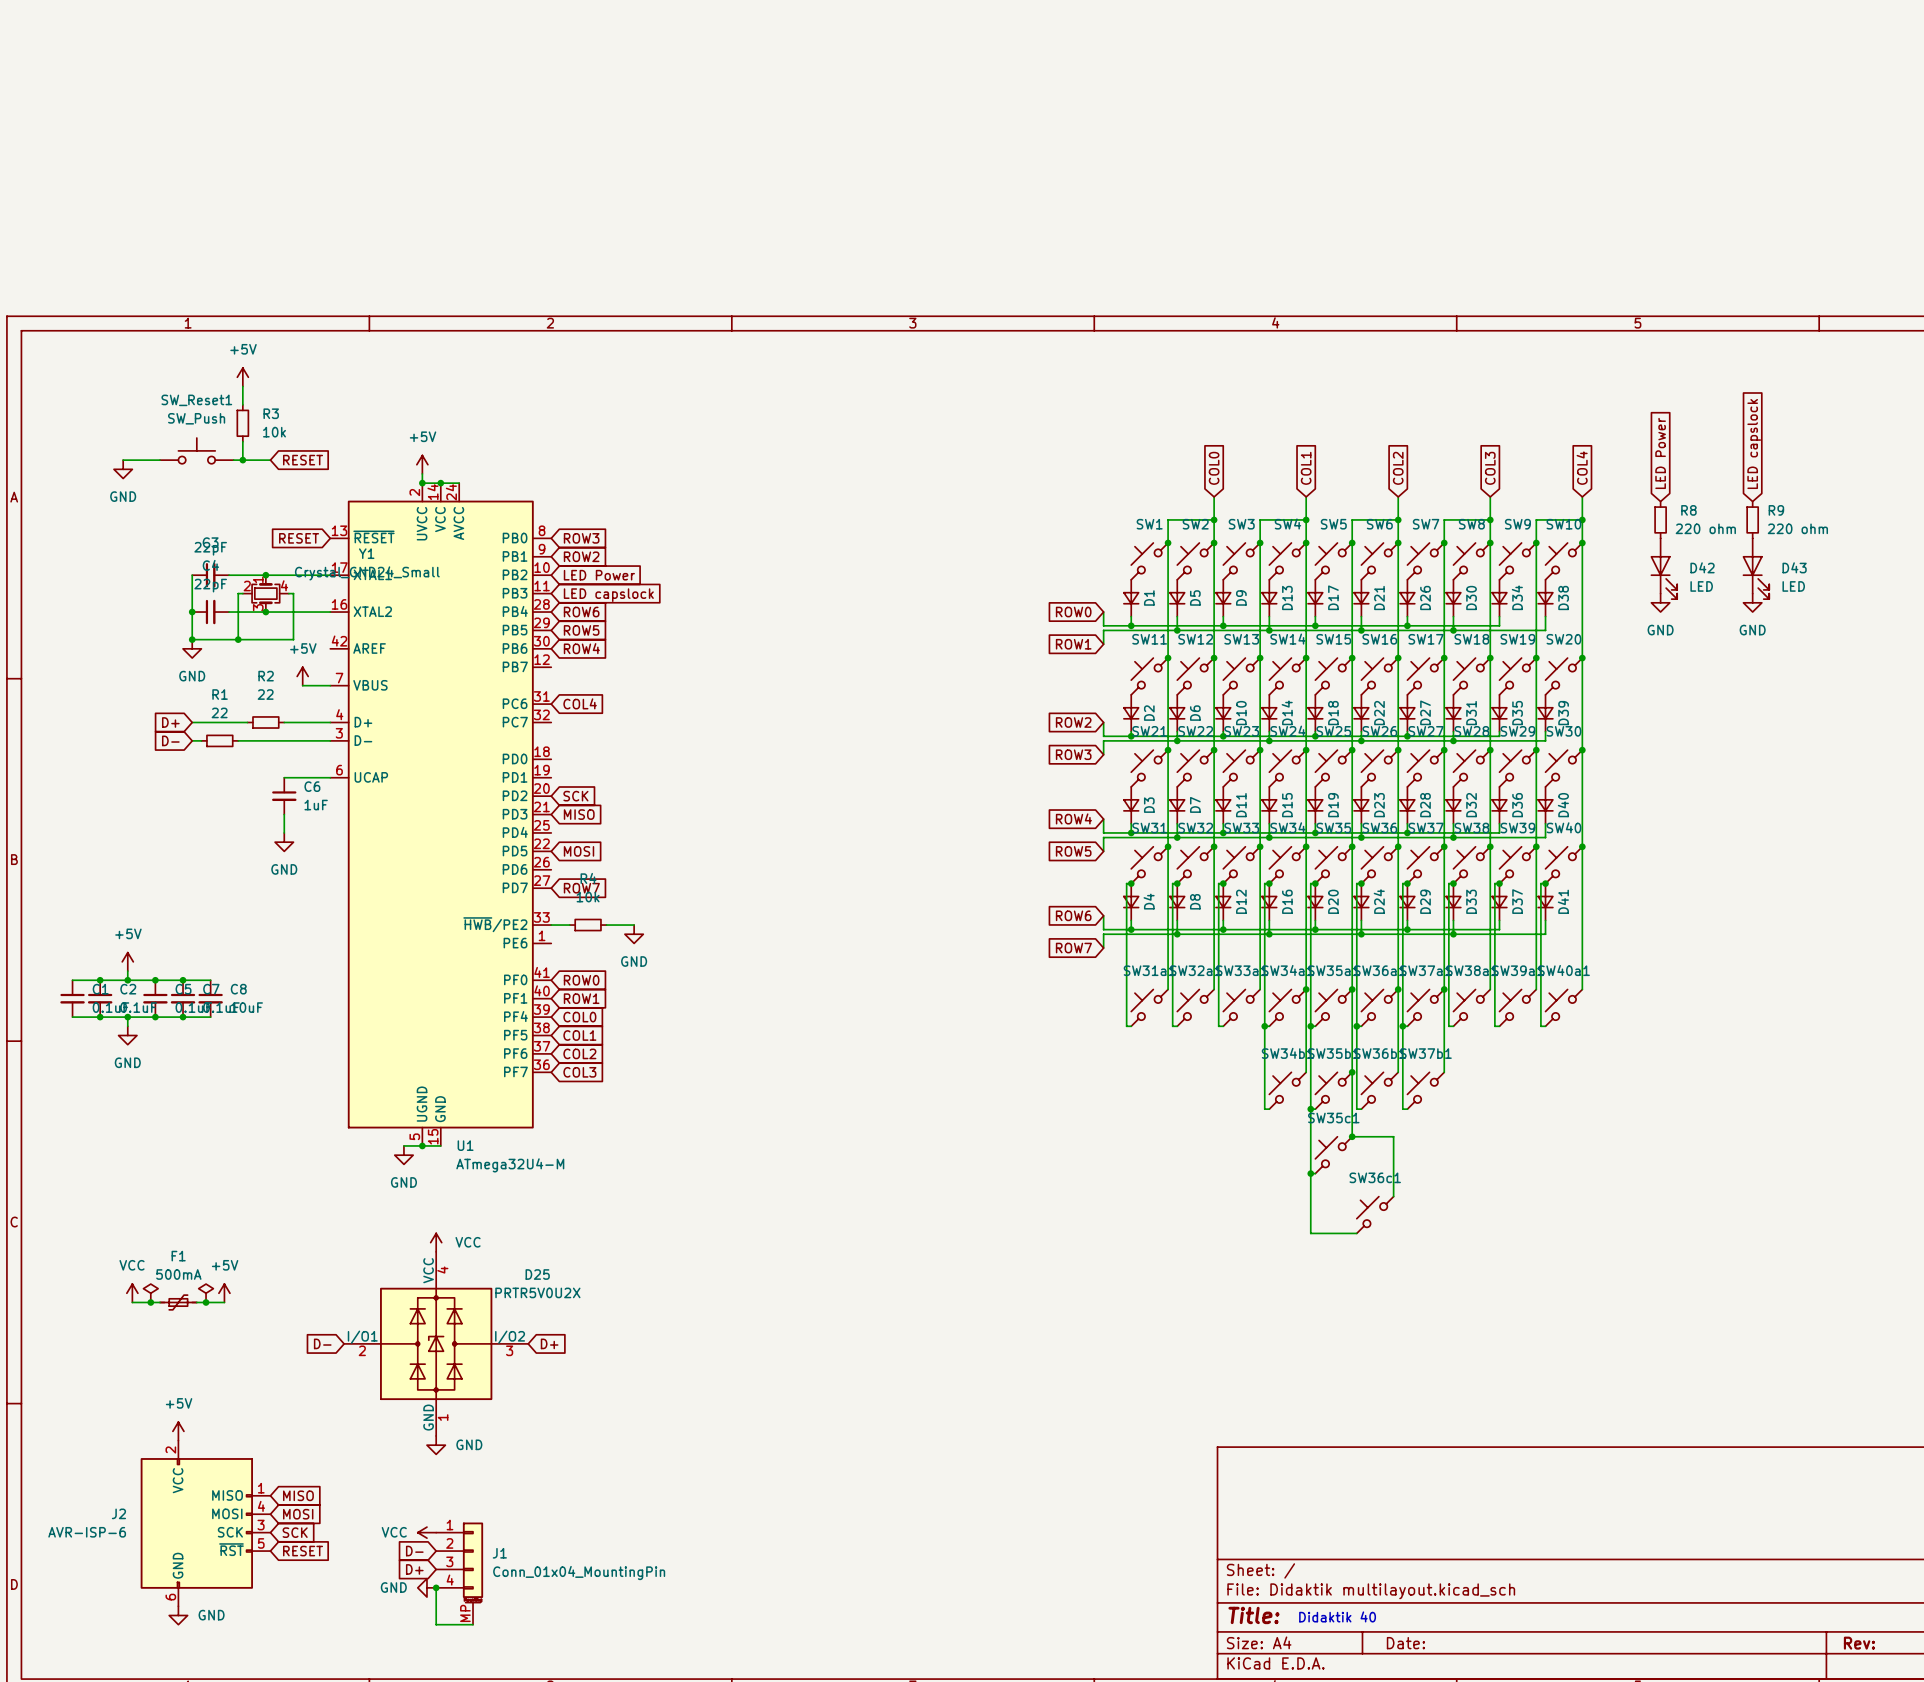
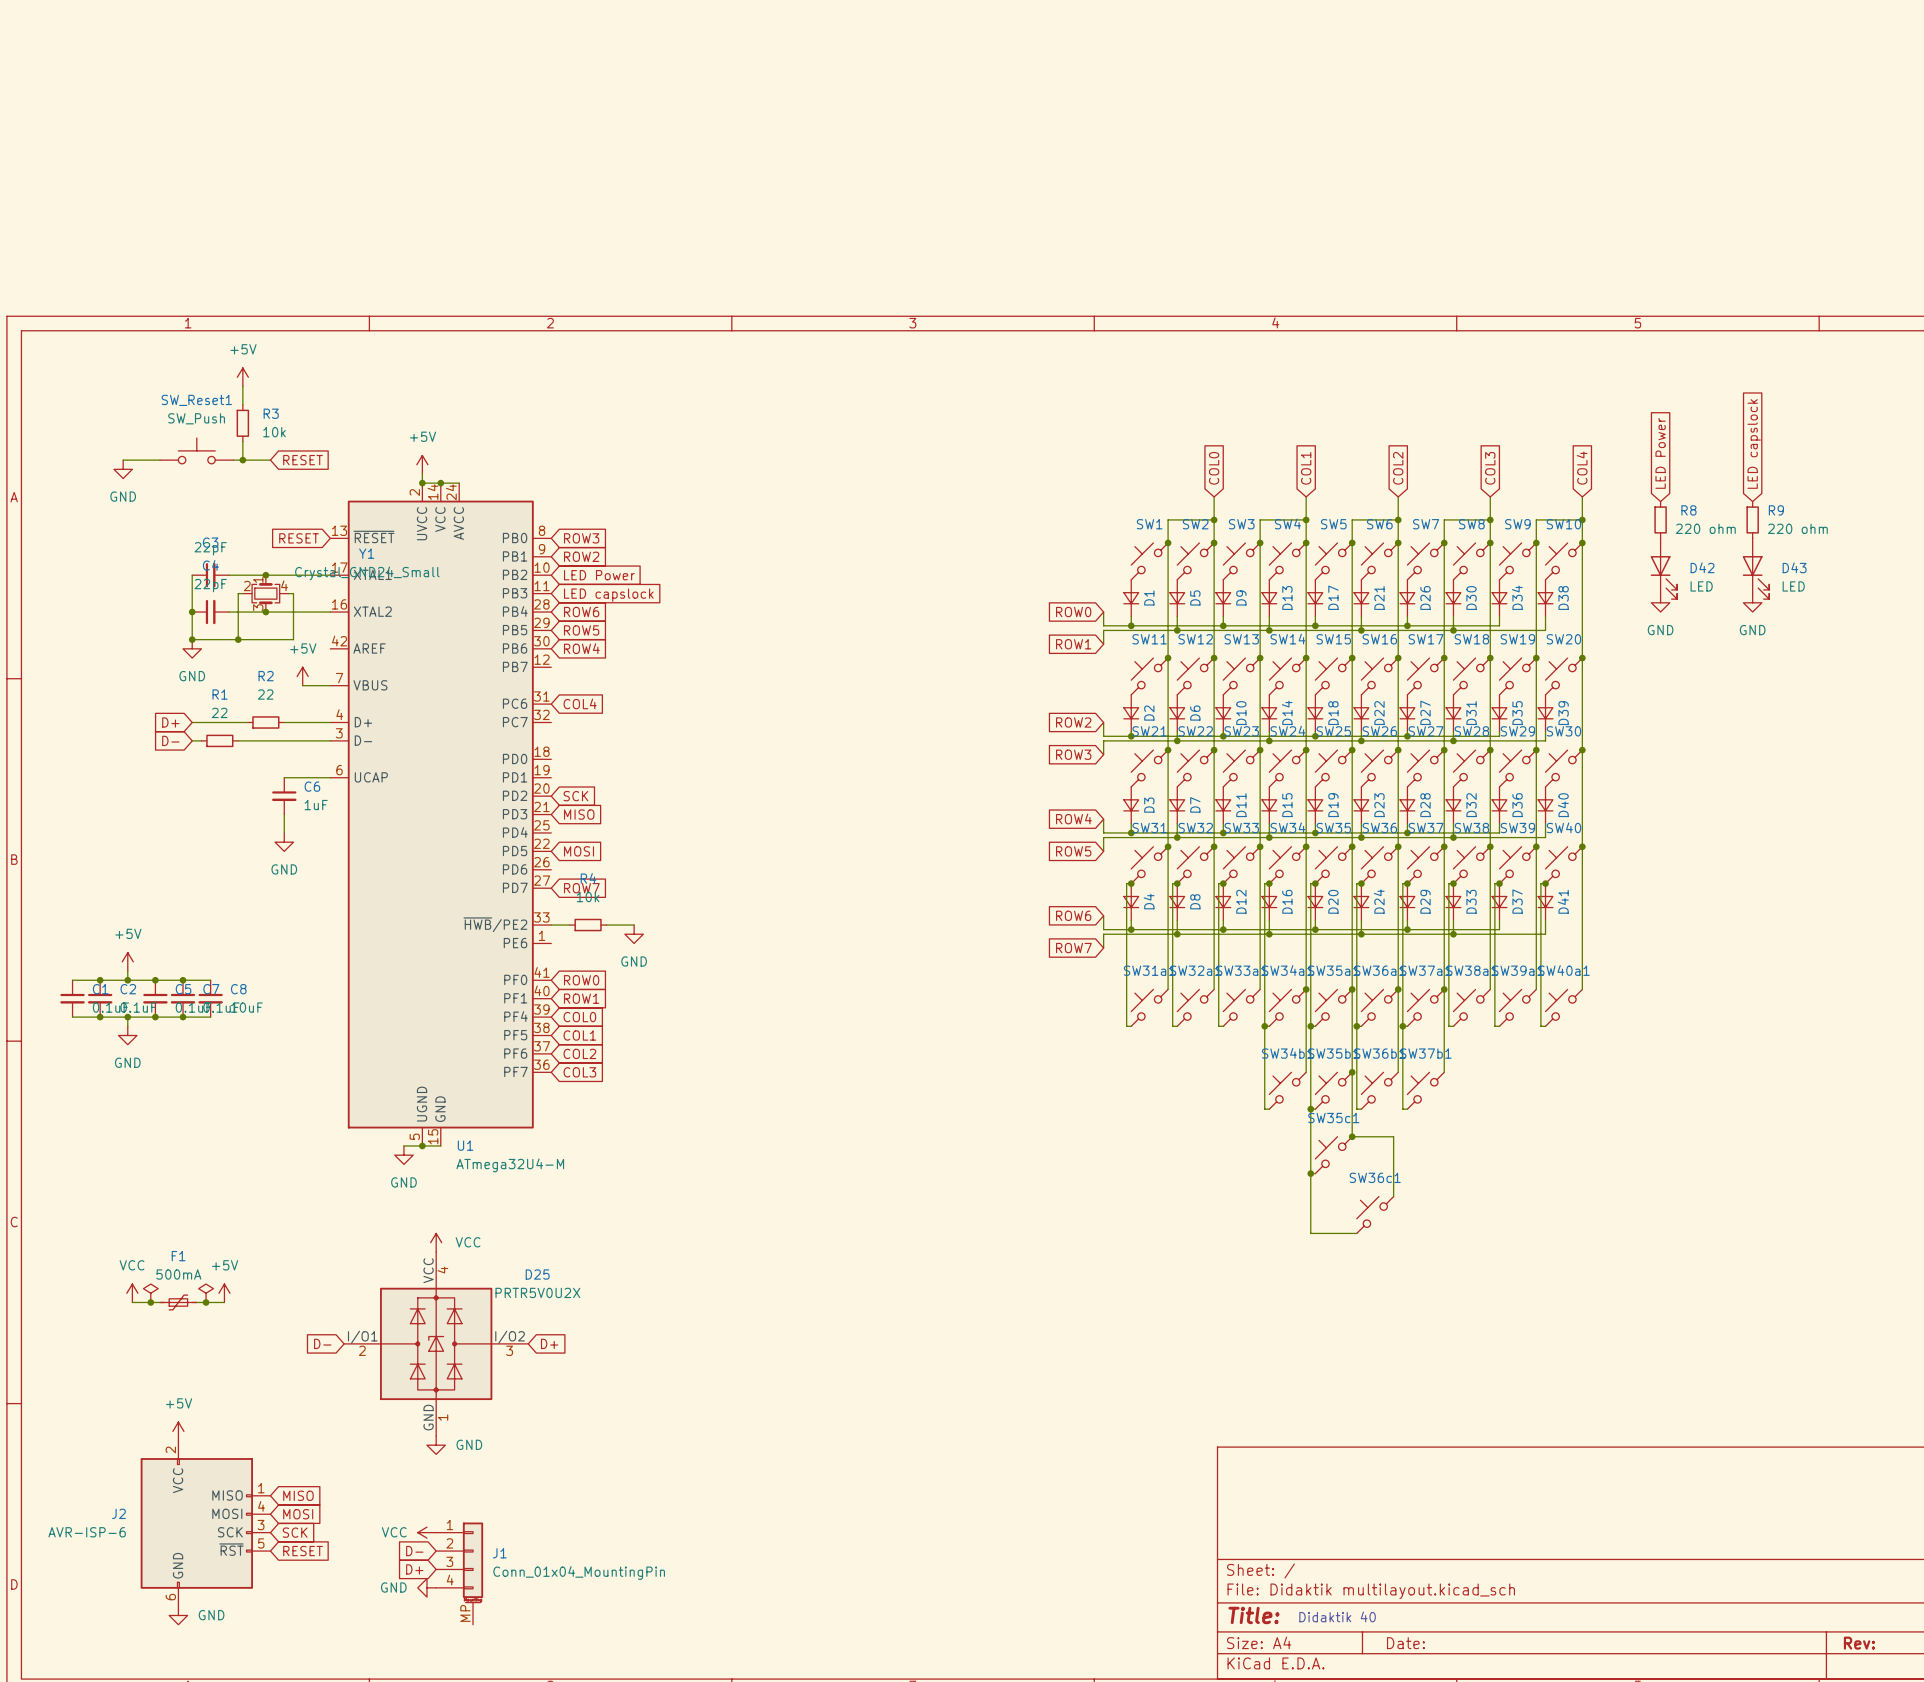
wire: (436, 1587) (436, 1624) (473, 1624) -> none
junction: (436, 1587) -> none

